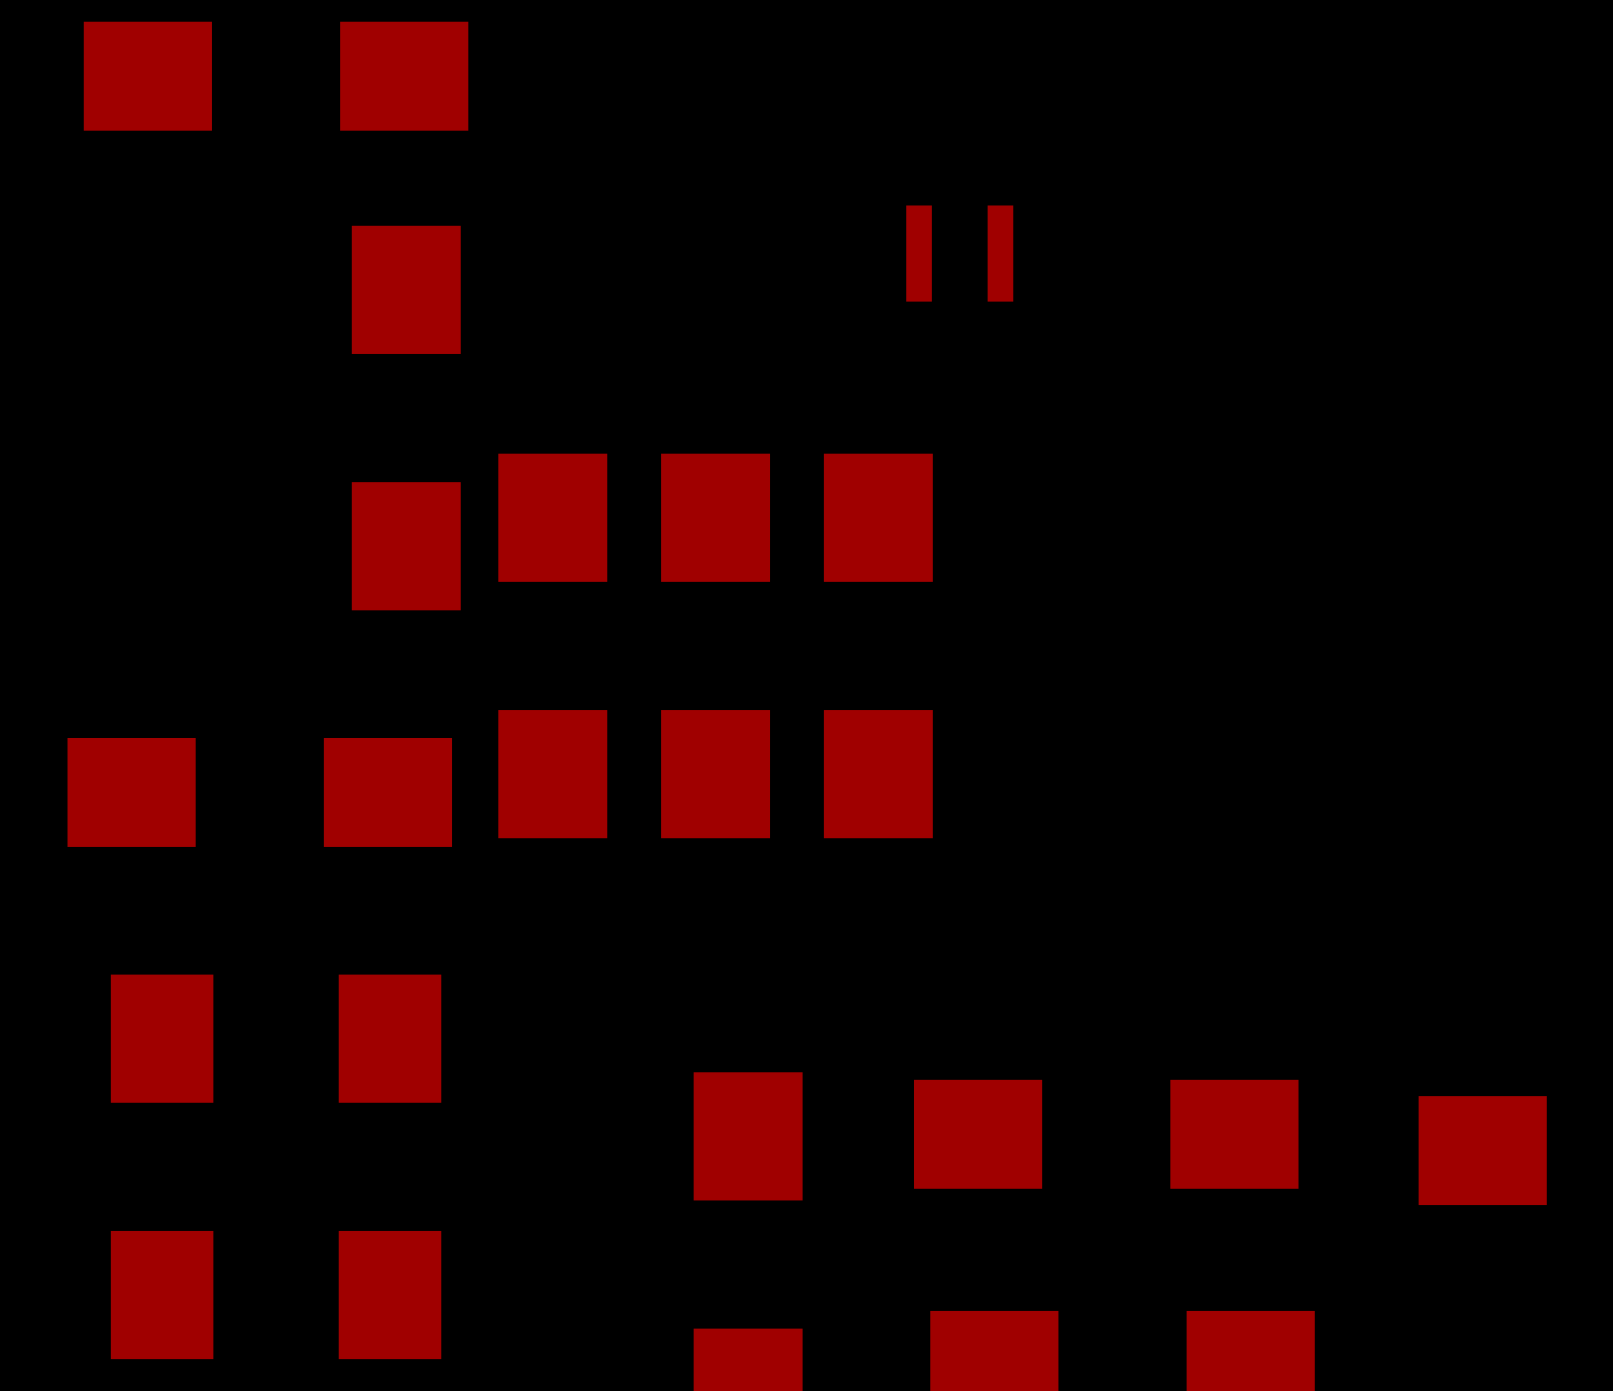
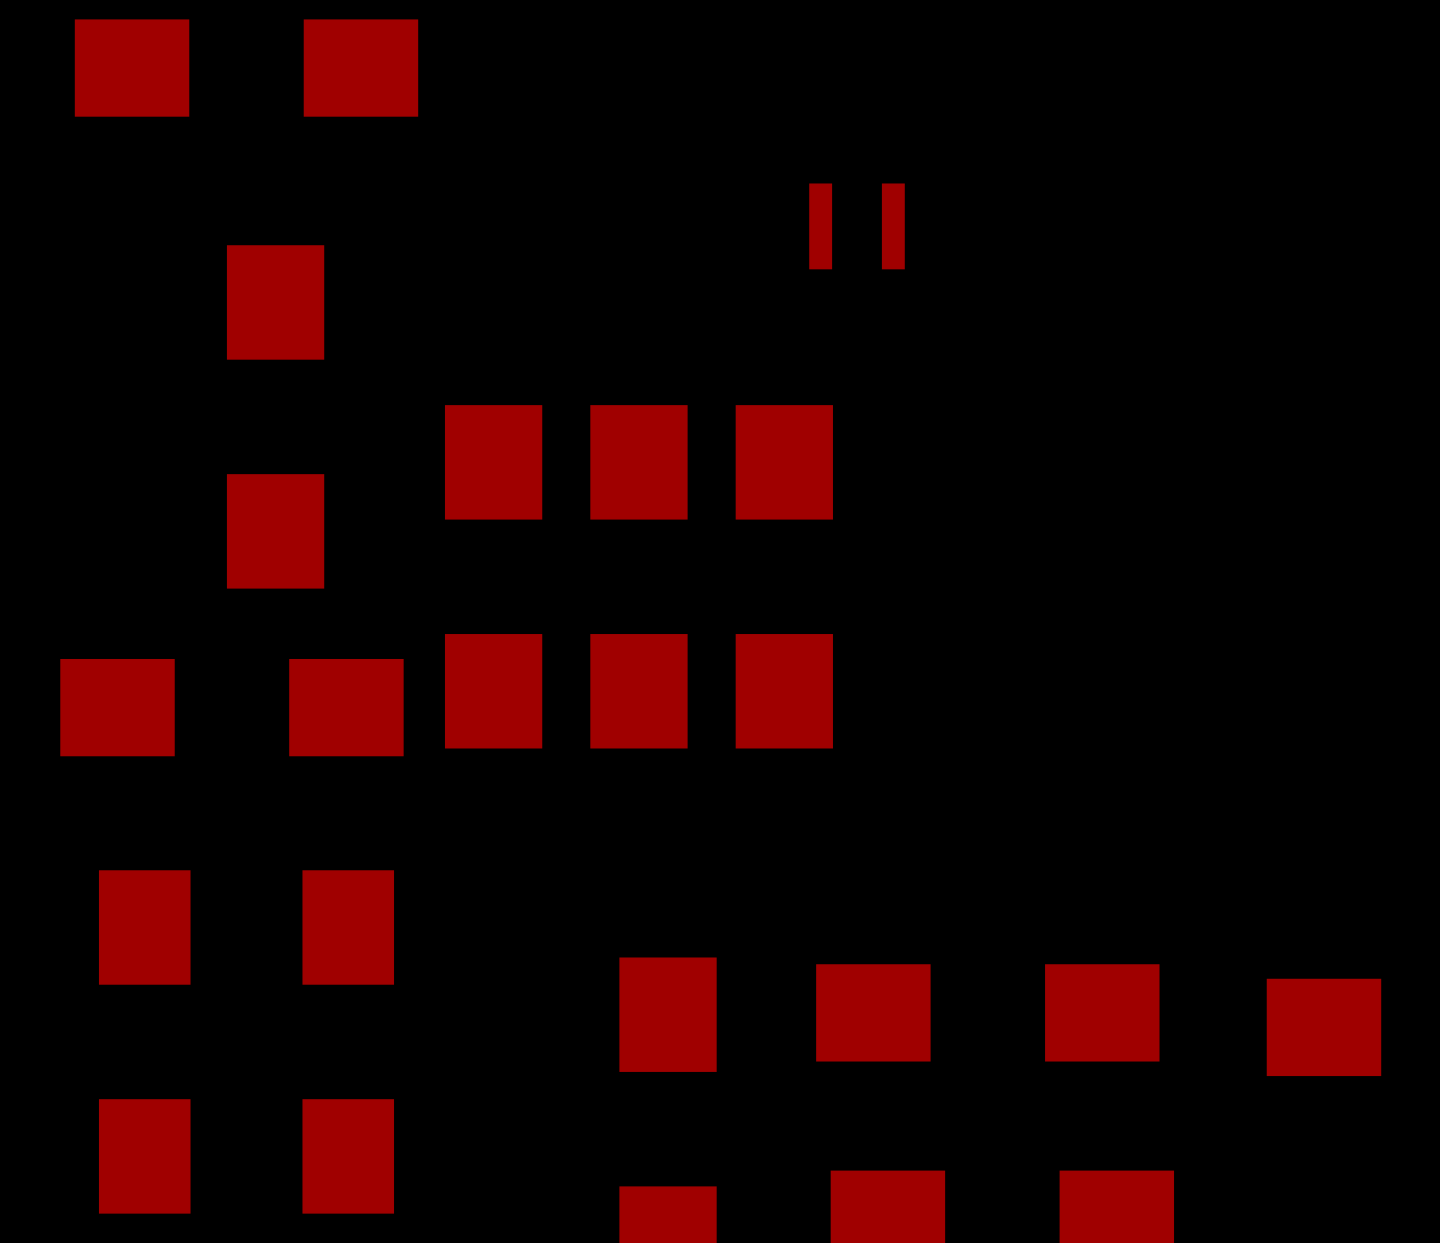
part position: (406, 418) -> (275, 416)

